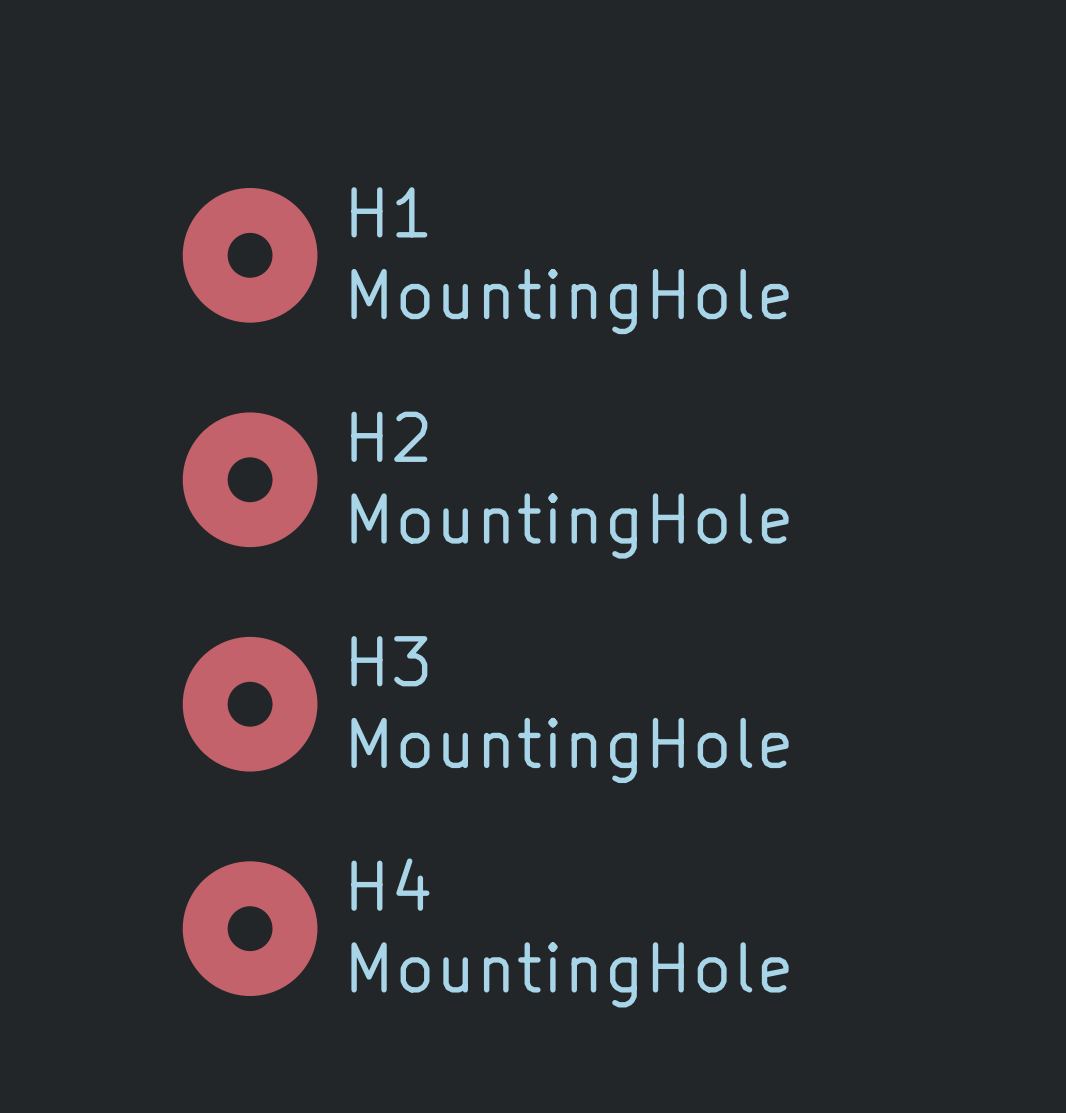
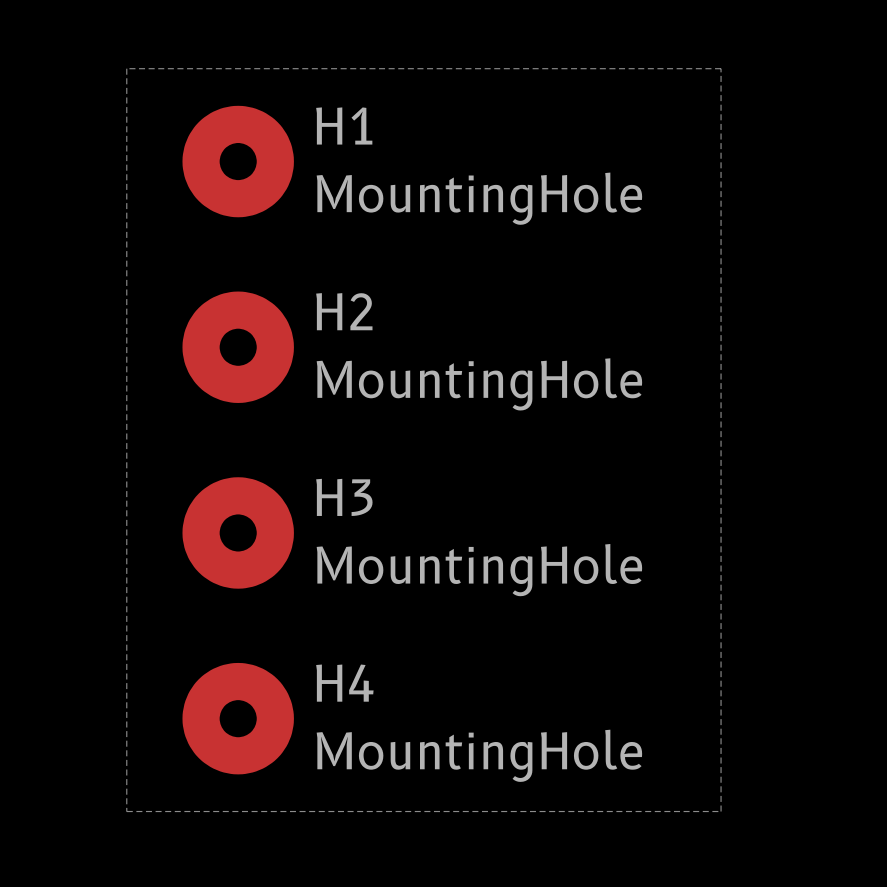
line: none -> (126, 68) (721, 68) (721, 811) (126, 811) (126, 68)

